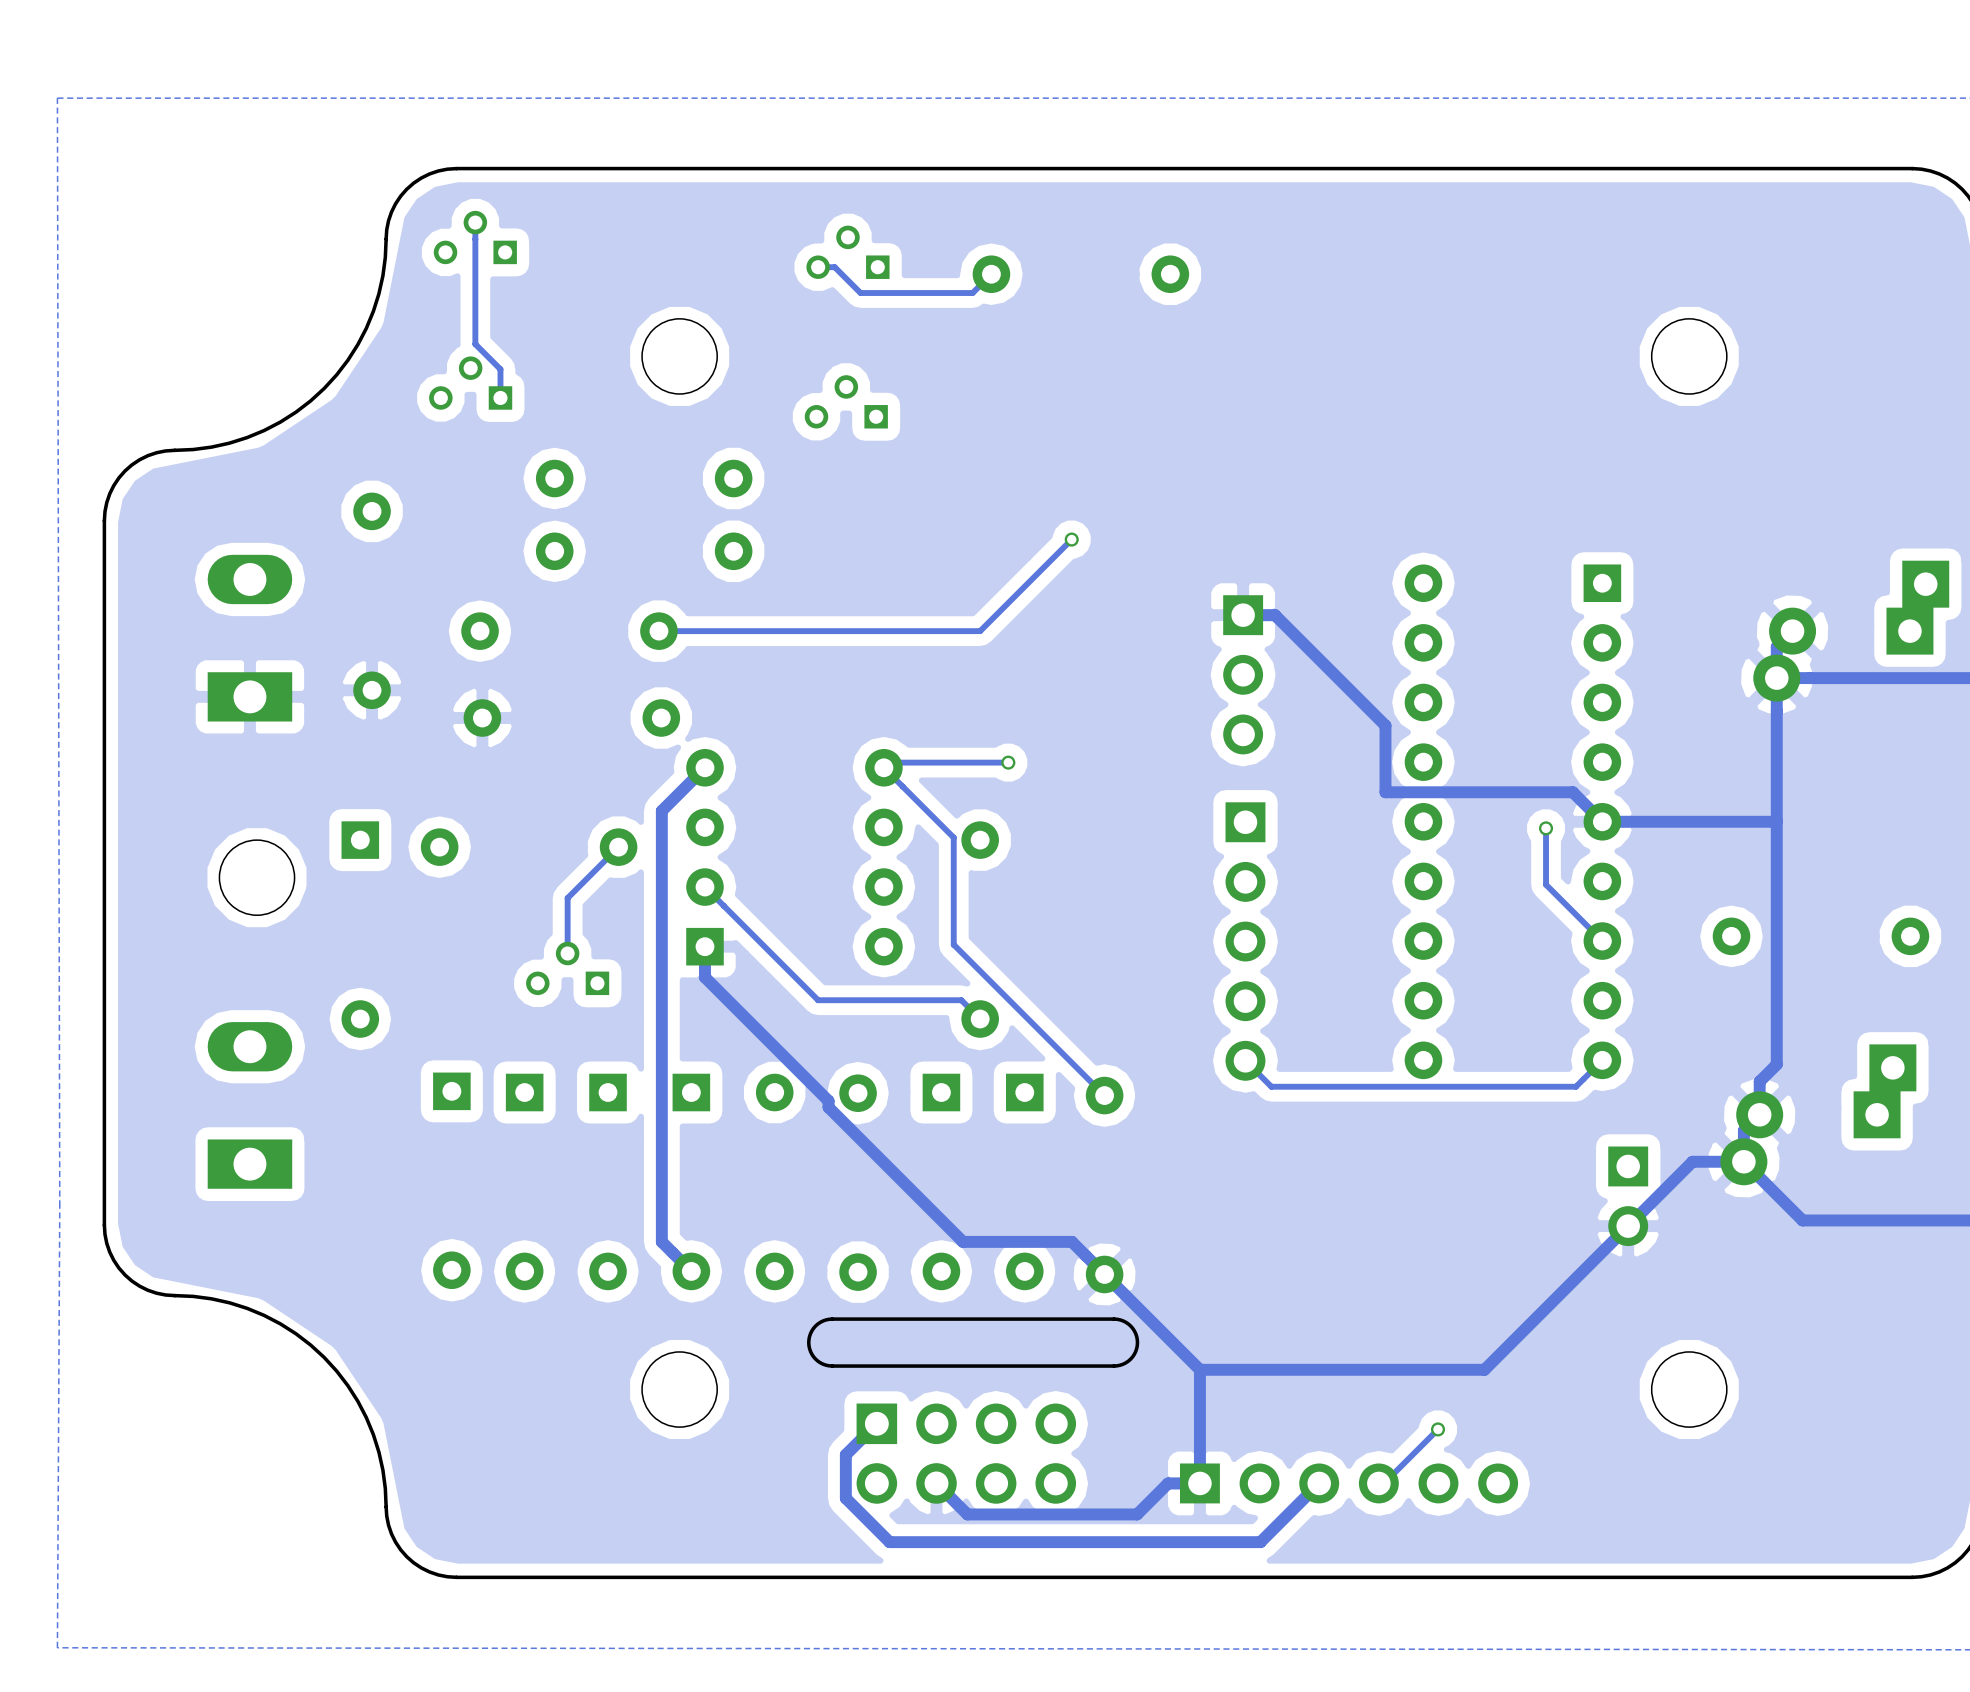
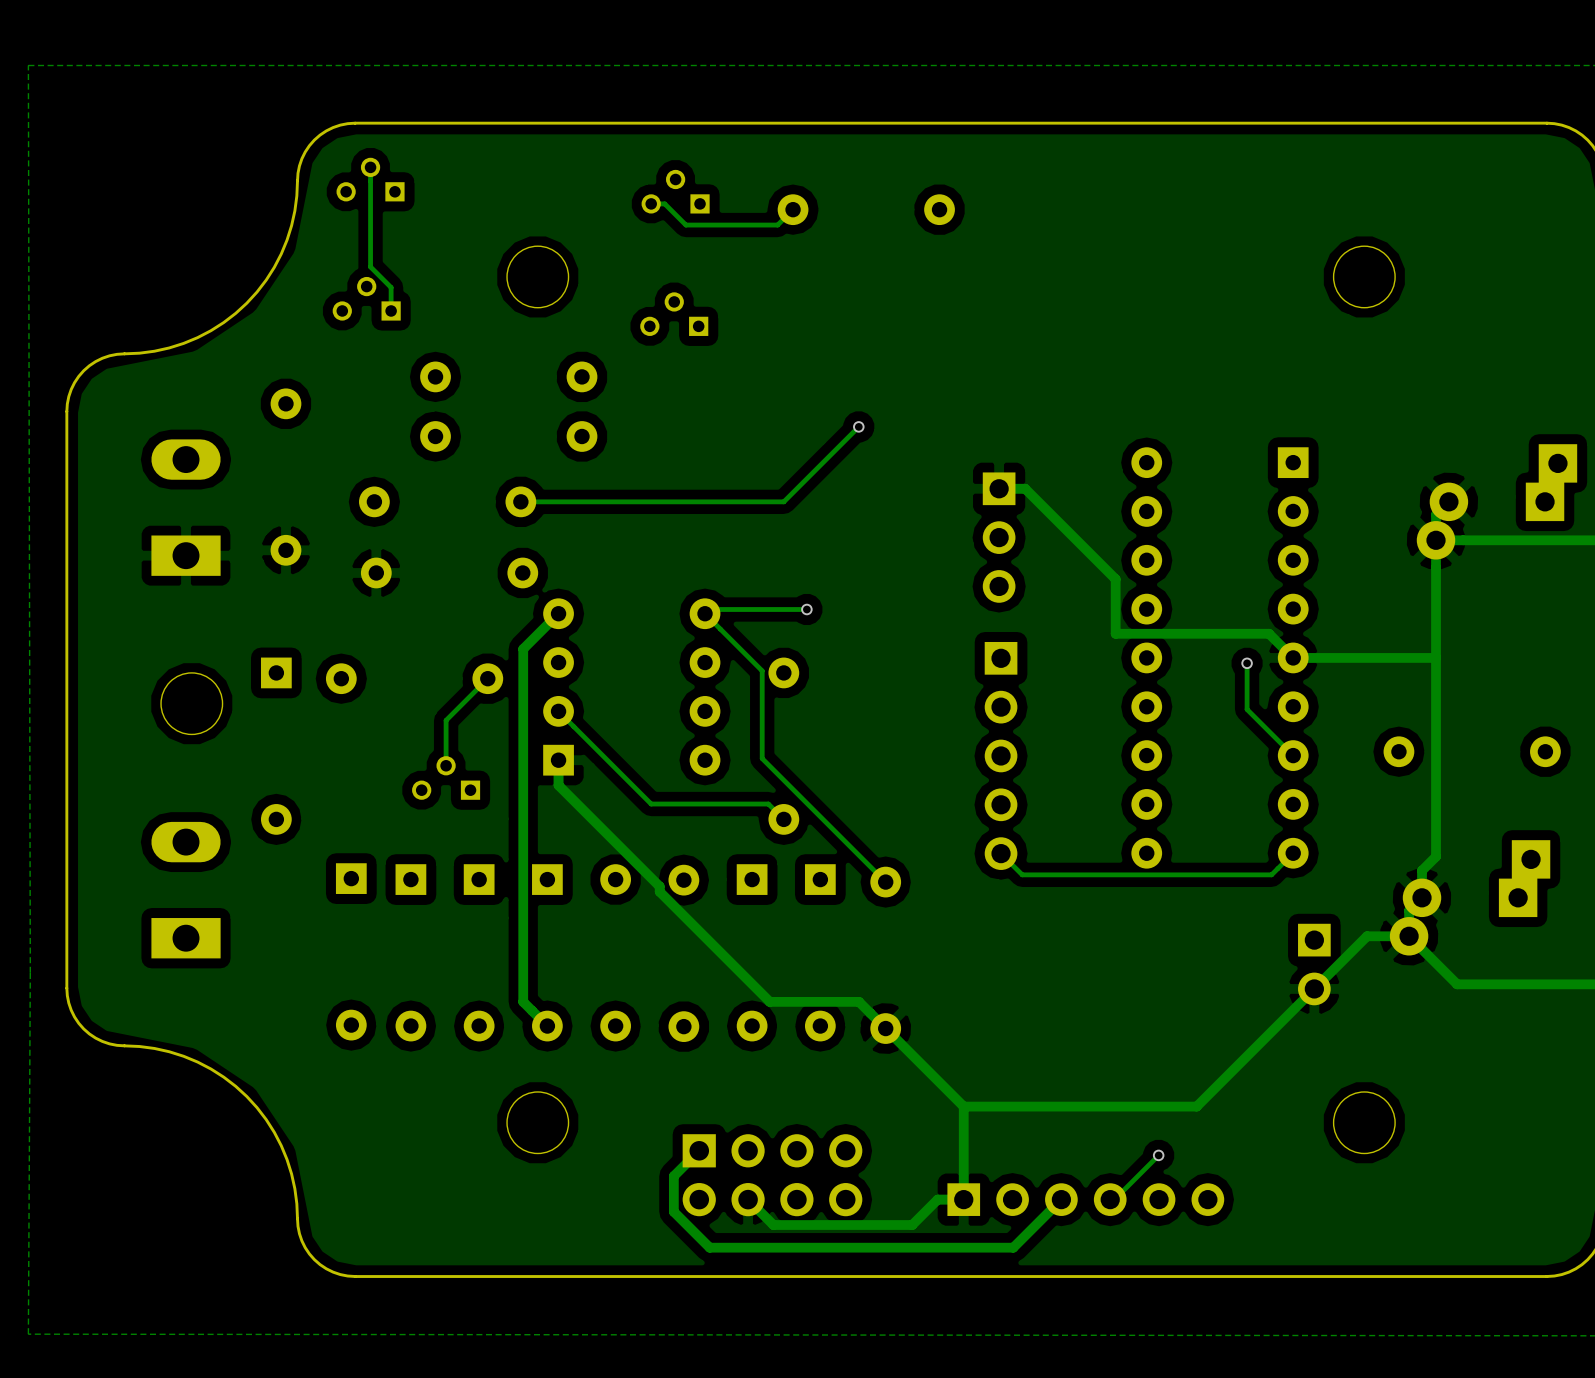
board edge: (1114, 1319) (829, 1319) (820, 1322) (813, 1328) (809, 1336) (808, 1345) (815, 1359) (829, 1365) (1117, 1365) (1130, 1359) (1135, 1351) (1137, 1342) (1135, 1333) (1130, 1325) (1122, 1320) (1114, 1319) -> none

